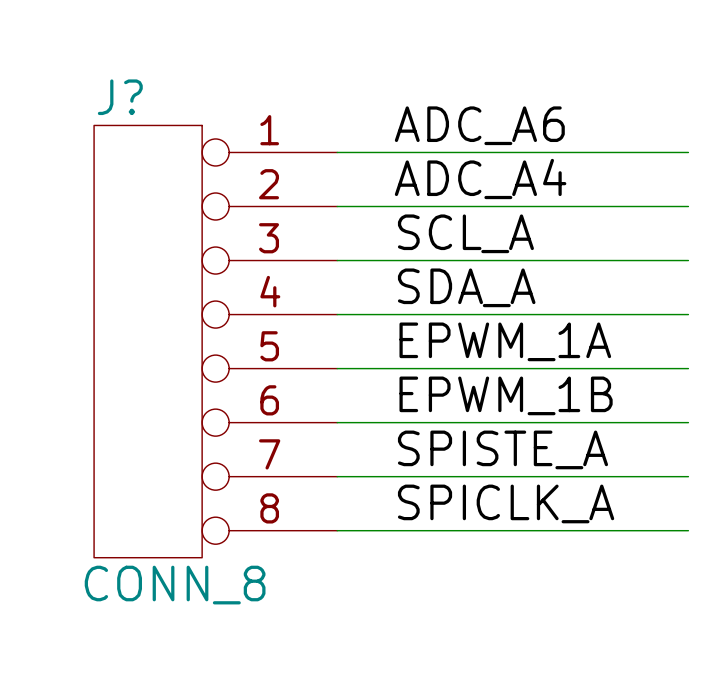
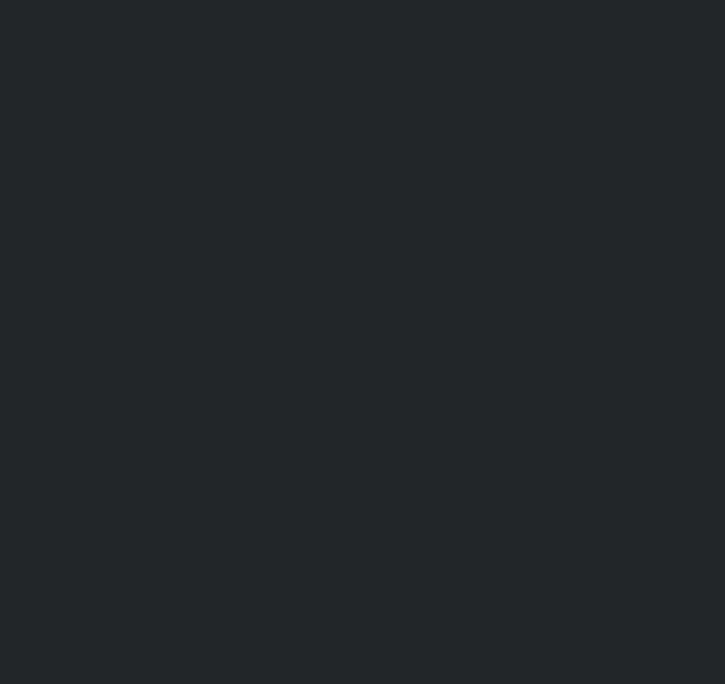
label: ADC_A6 (479, 125) -> none
wire: (337, 152) (688, 152) -> none
label: ADC_A4 (480, 178) -> none
wire: (337, 206) (688, 206) -> none
label: SCL_A (465, 233) -> none
wire: (337, 260) (688, 260) -> none
label: SDA_A (466, 287) -> none
wire: (337, 314) (688, 314) -> none
J?: CONN_8 (215, 341) -> none
label: EPWM_1A (505, 341) -> none
wire: (337, 368) (688, 368) -> none
label: EPWM_1B (506, 395) -> none
wire: (337, 422) (688, 422) -> none
label: SPISTE_A (502, 449) -> none
wire: (337, 476) (688, 476) -> none
label: SPICLK_A (506, 503) -> none
wire: (337, 530) (688, 530) -> none

